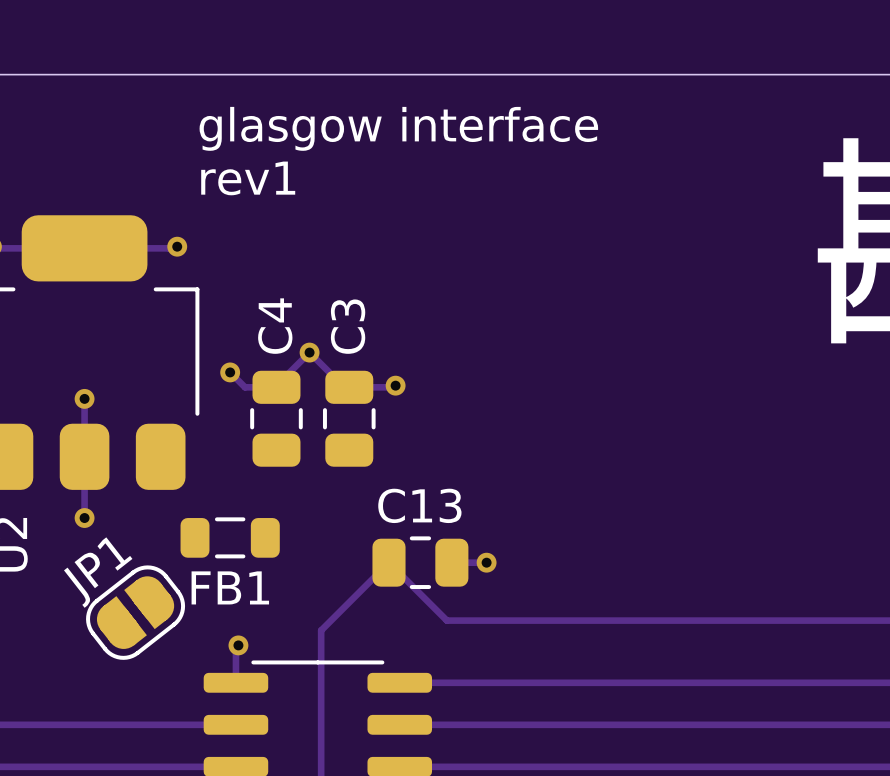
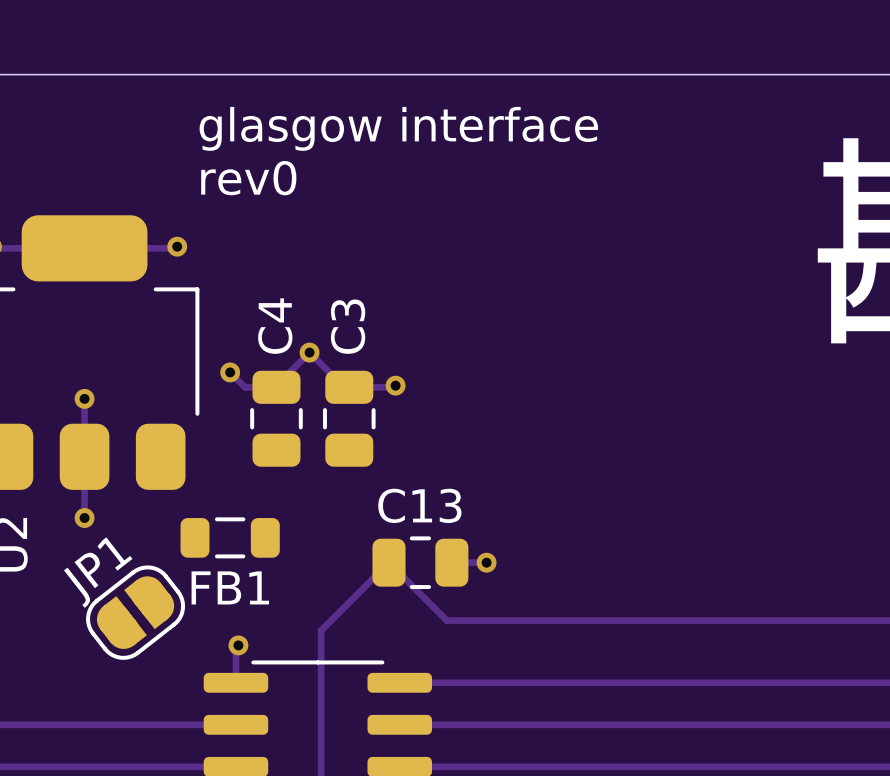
text: rev1 (248, 178) -> rev0 (248, 178)

